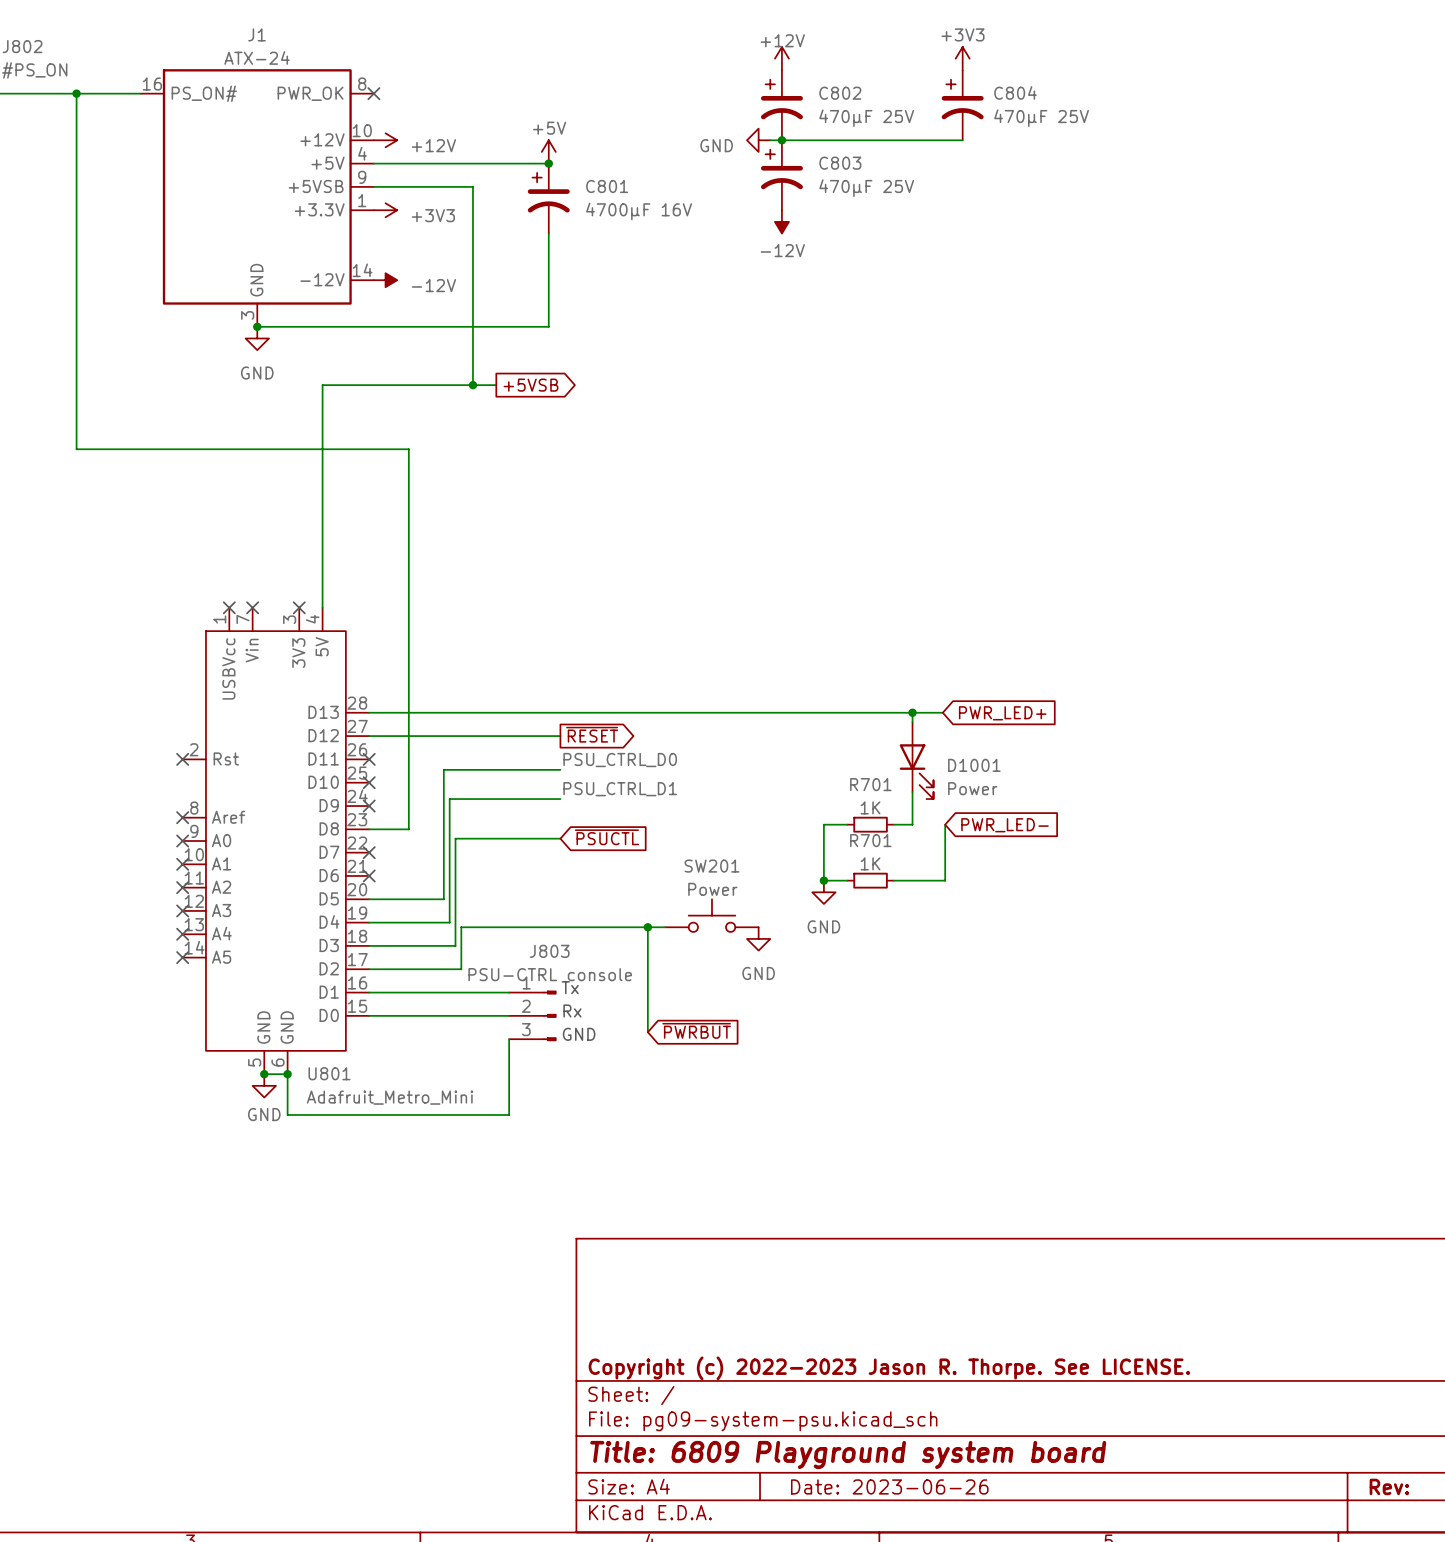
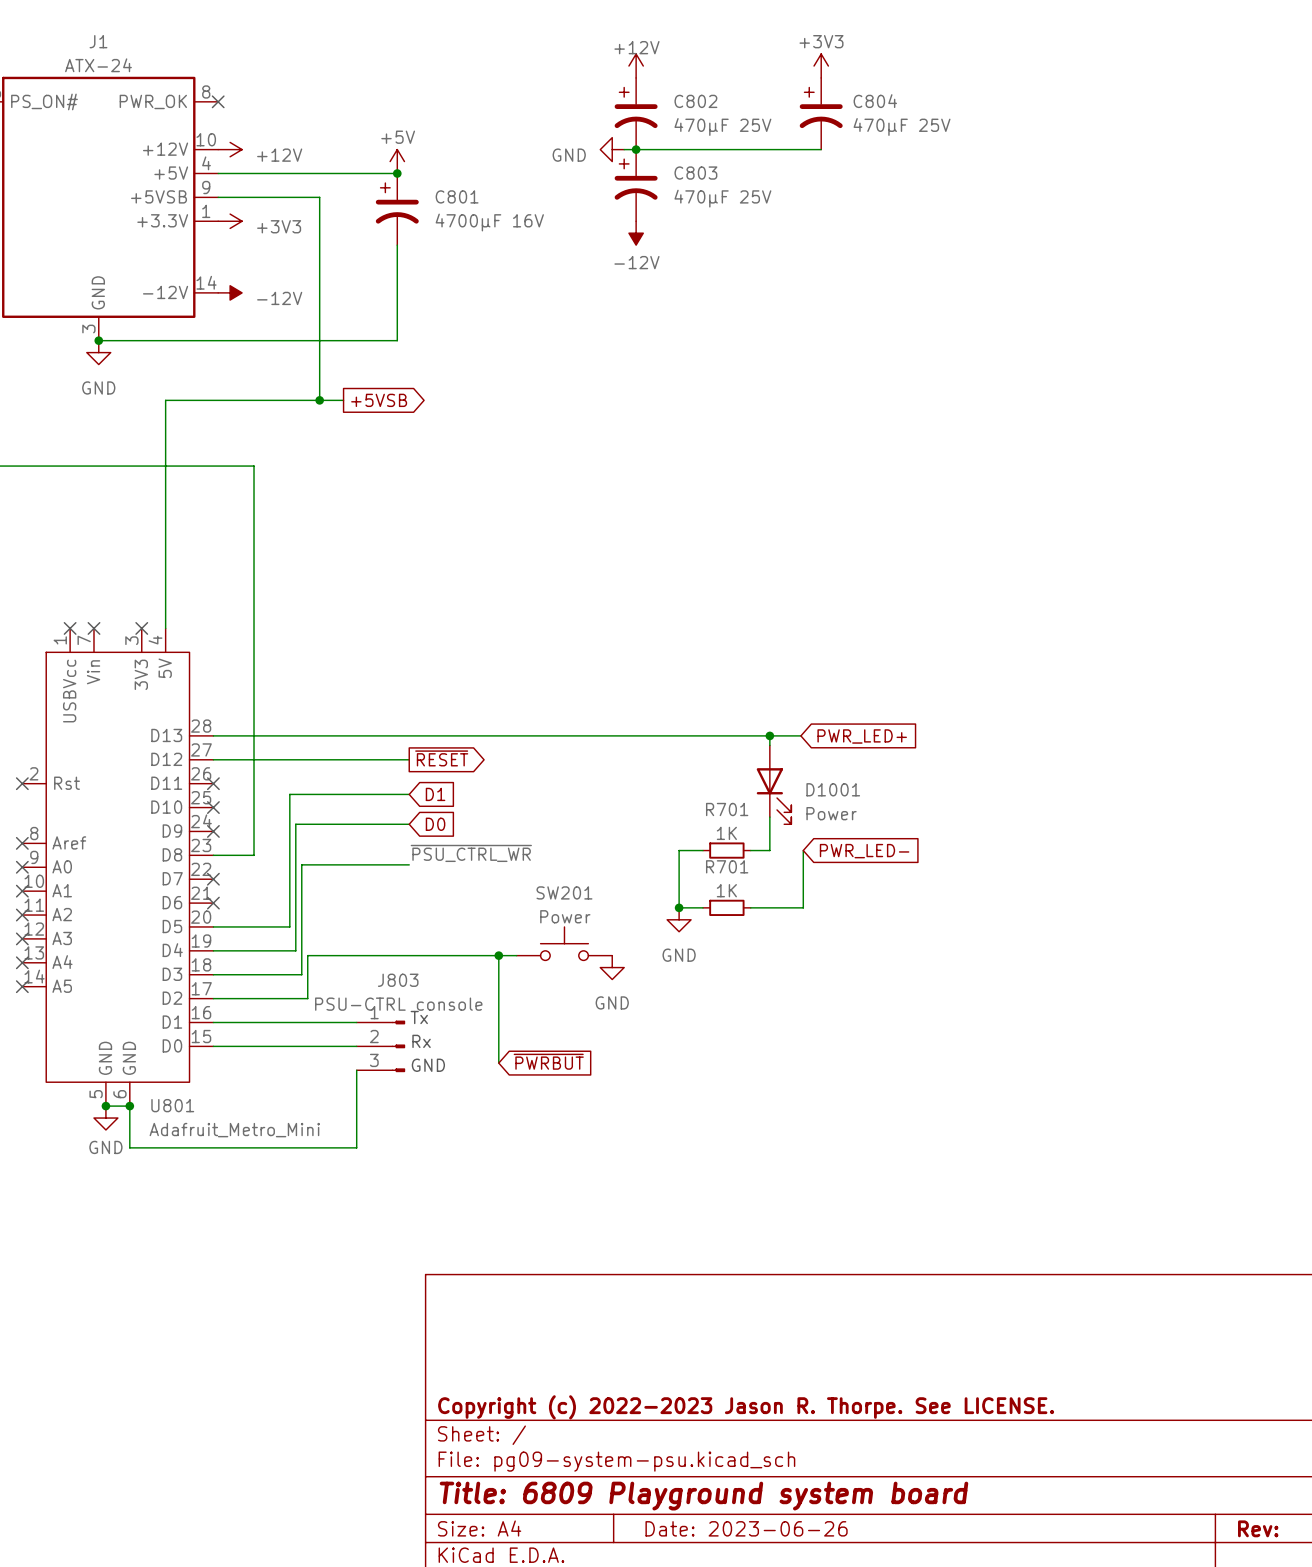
label: PSU_CTRL_D0 (620, 760) -> none
global label: none -> D1 (435, 794)
label: PSU_CTRL_D1 (620, 789) -> none
global label: none -> D0 (435, 824)
label: none -> ~{PSU_CTRL_WR} (471, 853)
global label: ~{PSUCTL} (606, 837) -> none

